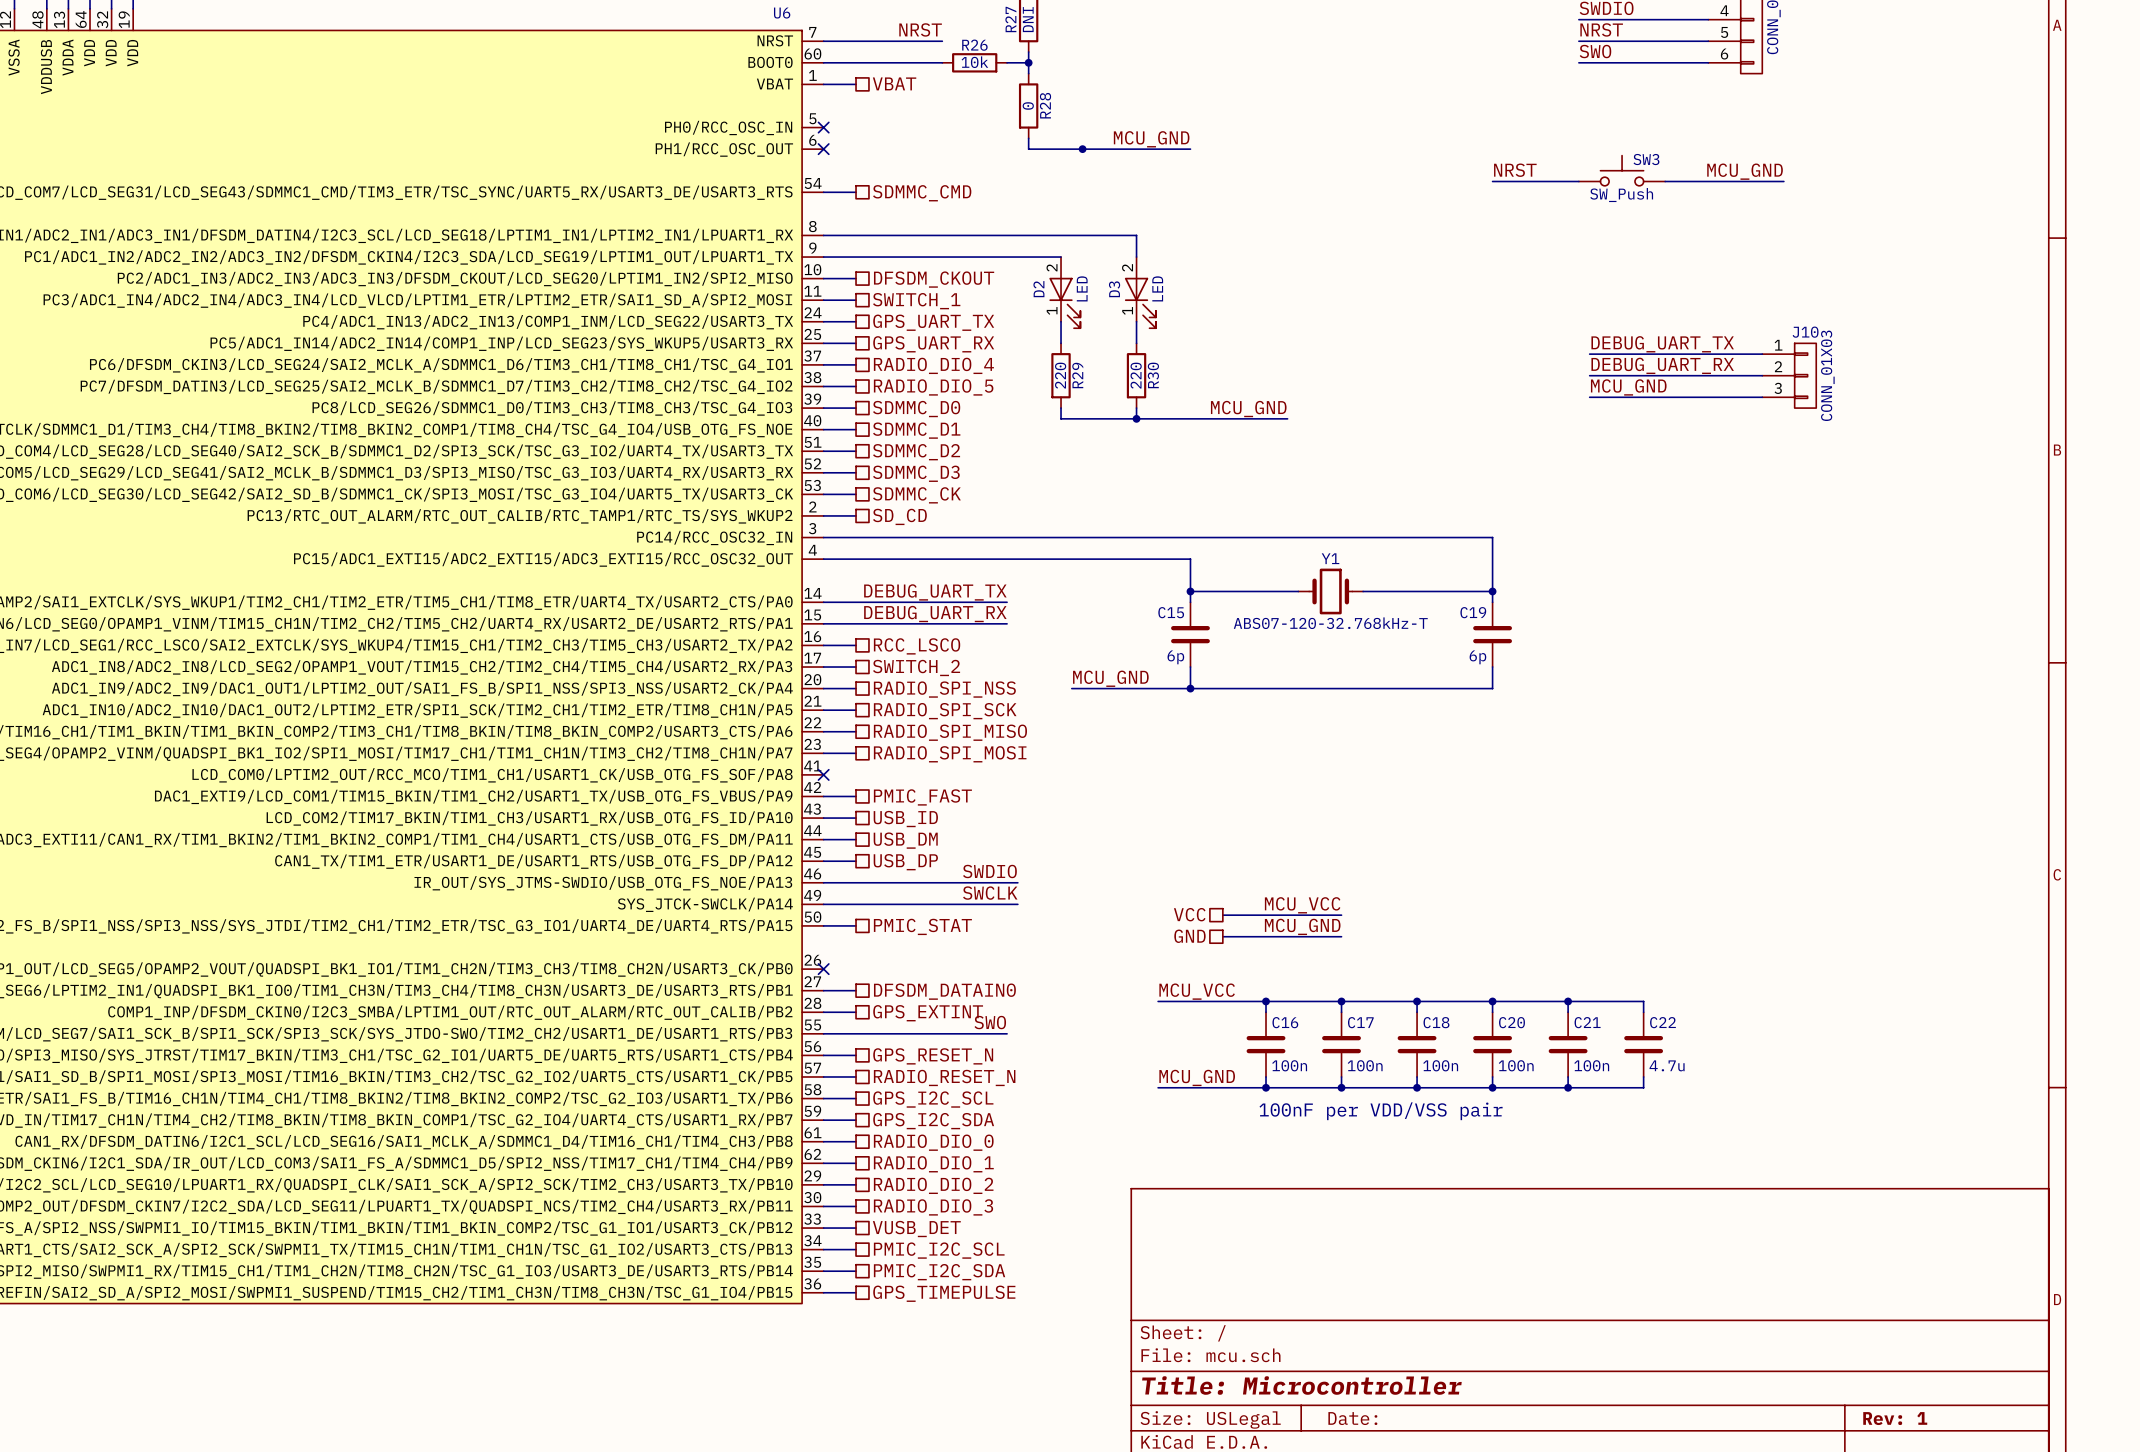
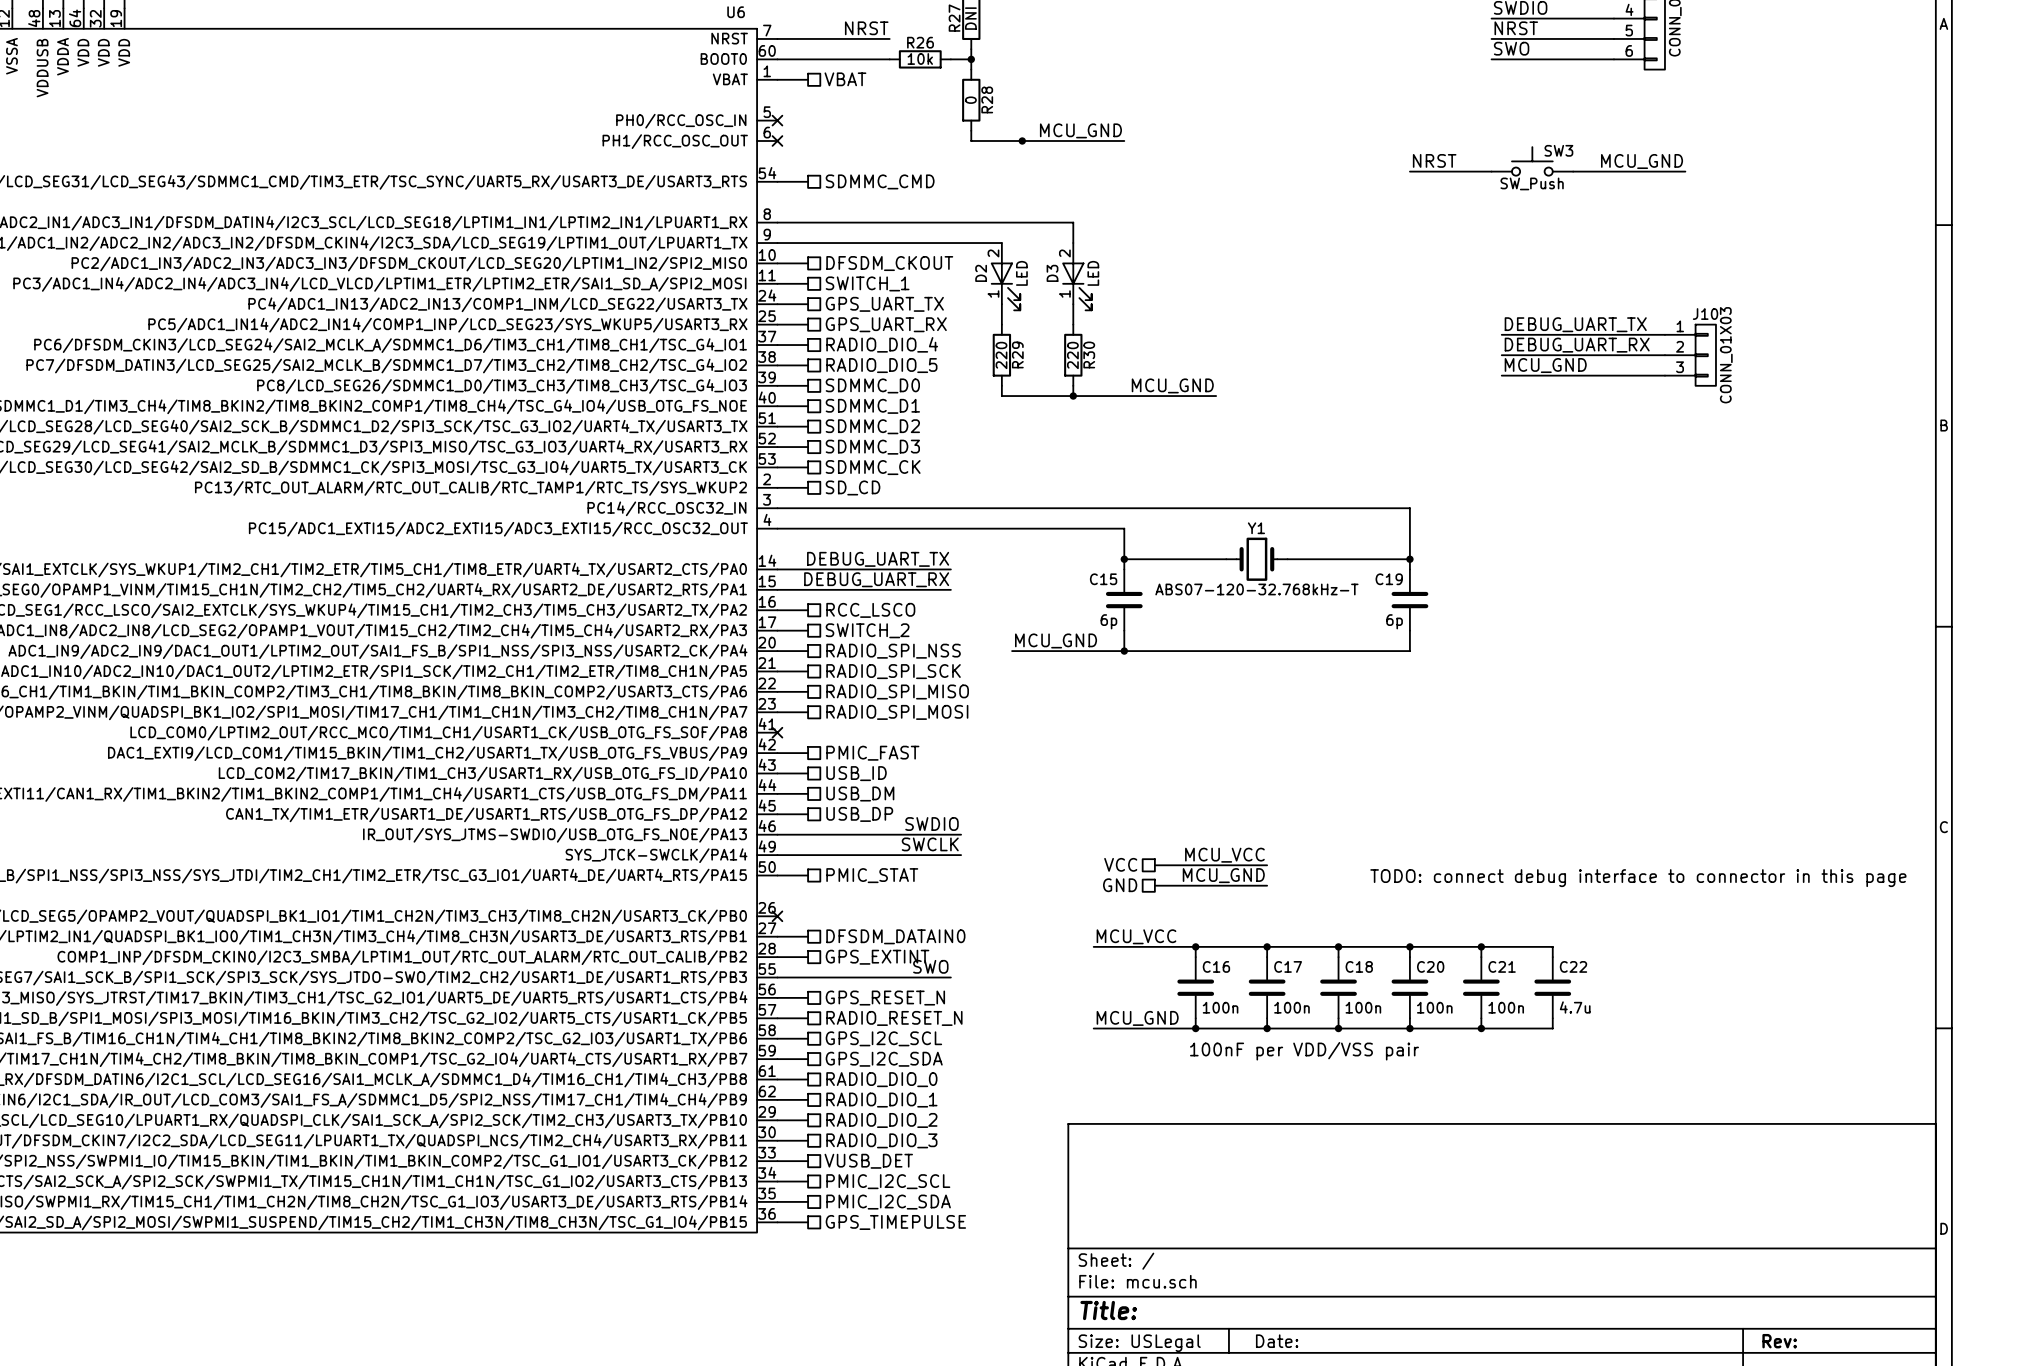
text: none -> TODO: connect debug interface to connector in this page (1638, 878)
title block: Title: Microcontroller (1301, 1385) -> Title: (1108, 1310)
title block: Rev: 1 (1895, 1418) -> Rev: (1779, 1341)

